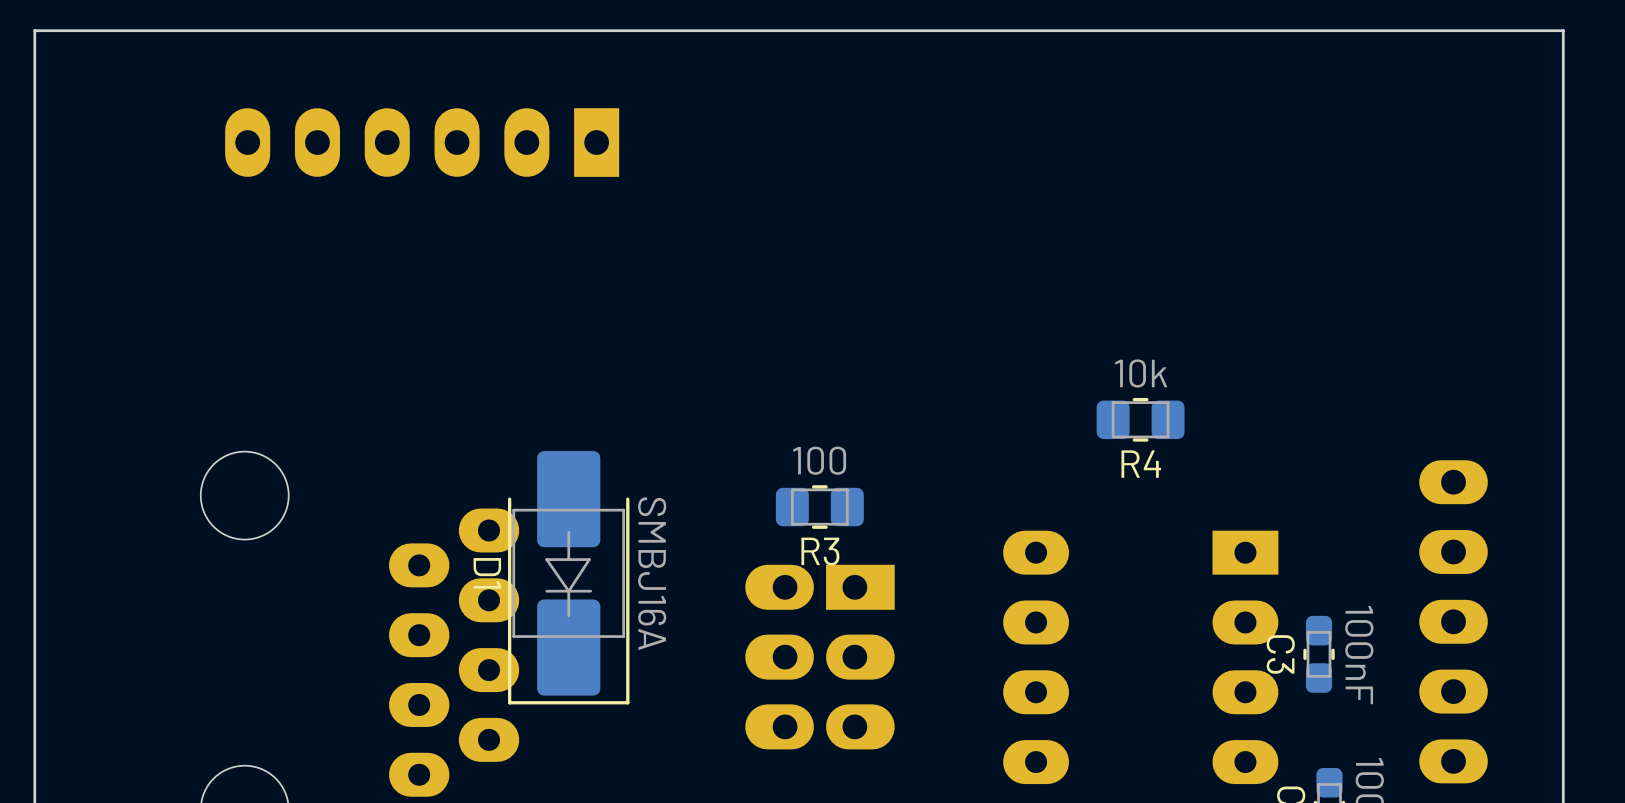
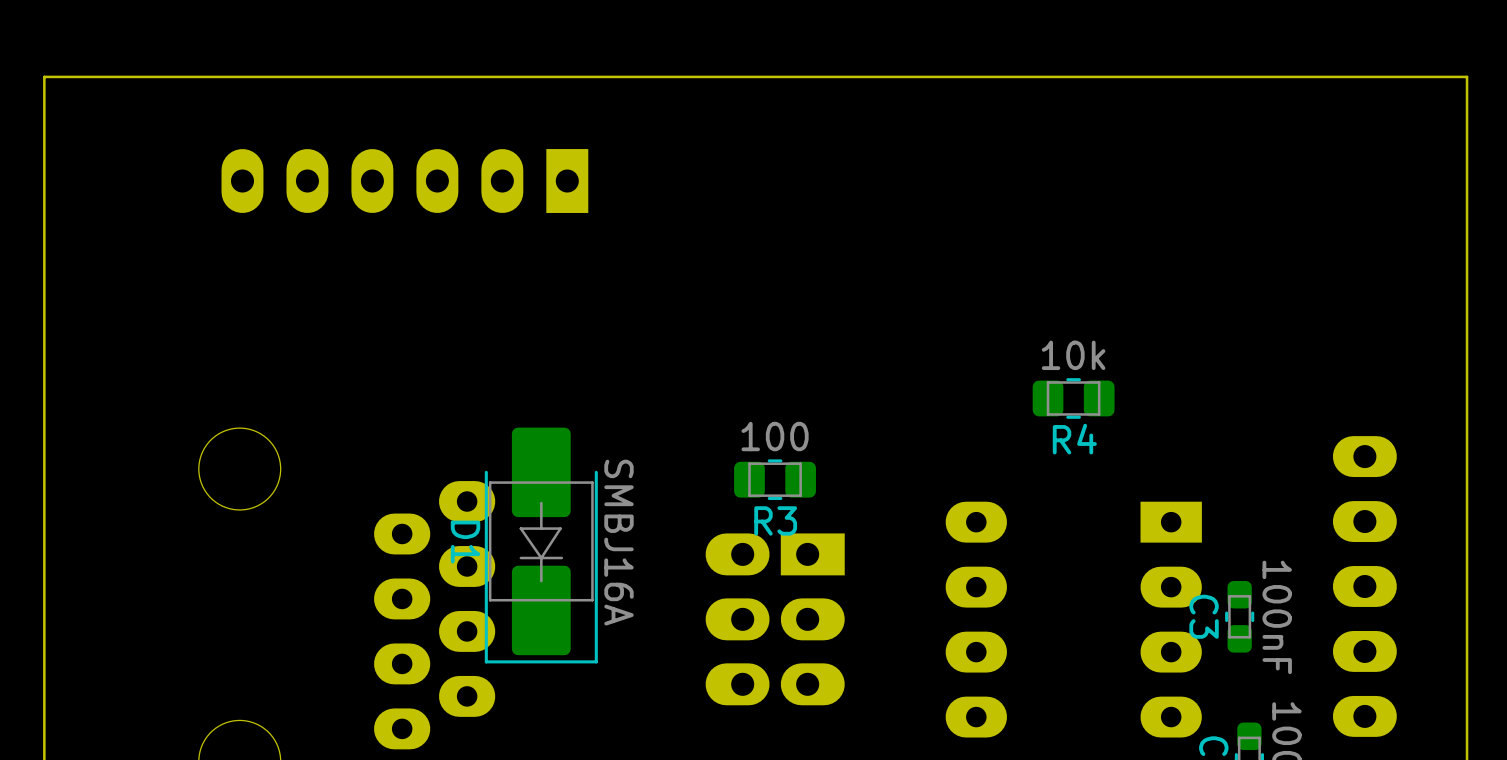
board edge: (1563, 74) (1563, 30) (34, 30) (34, 74) -> (1467, 76) (44, 76)
part position: (422, 142) -> (404, 181)

